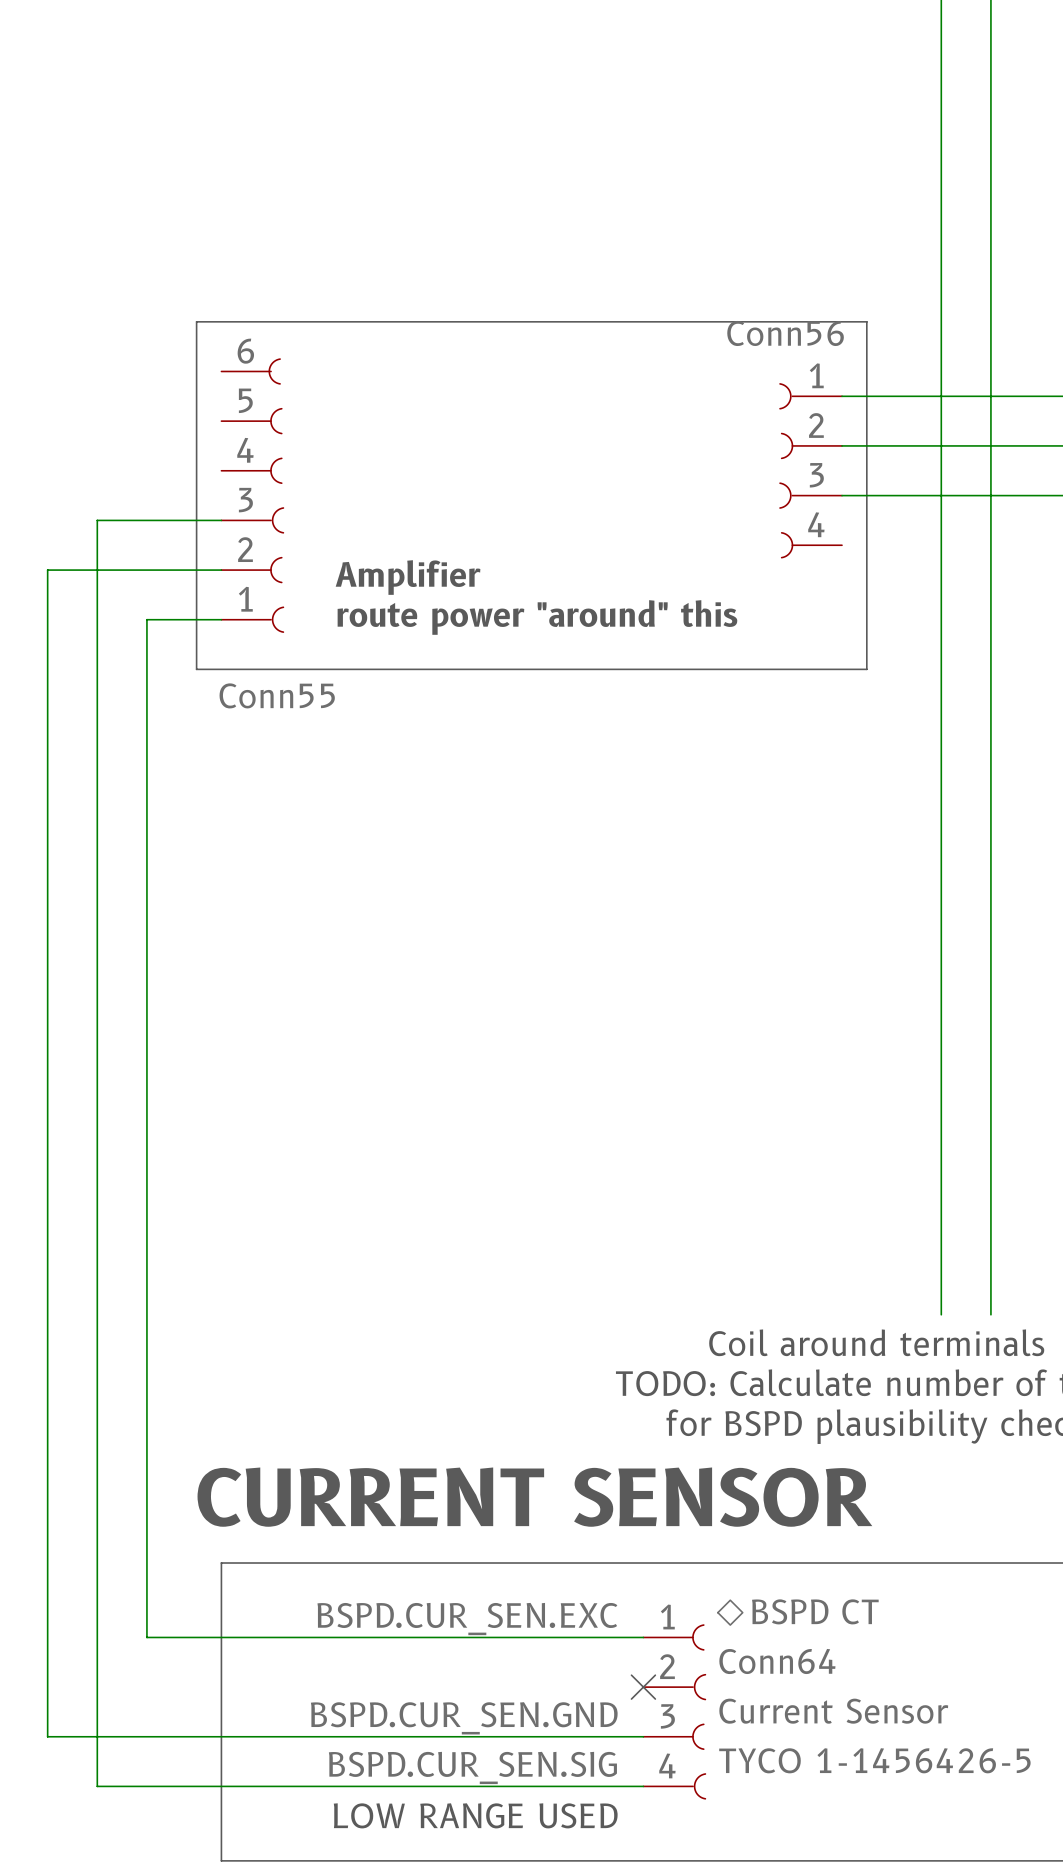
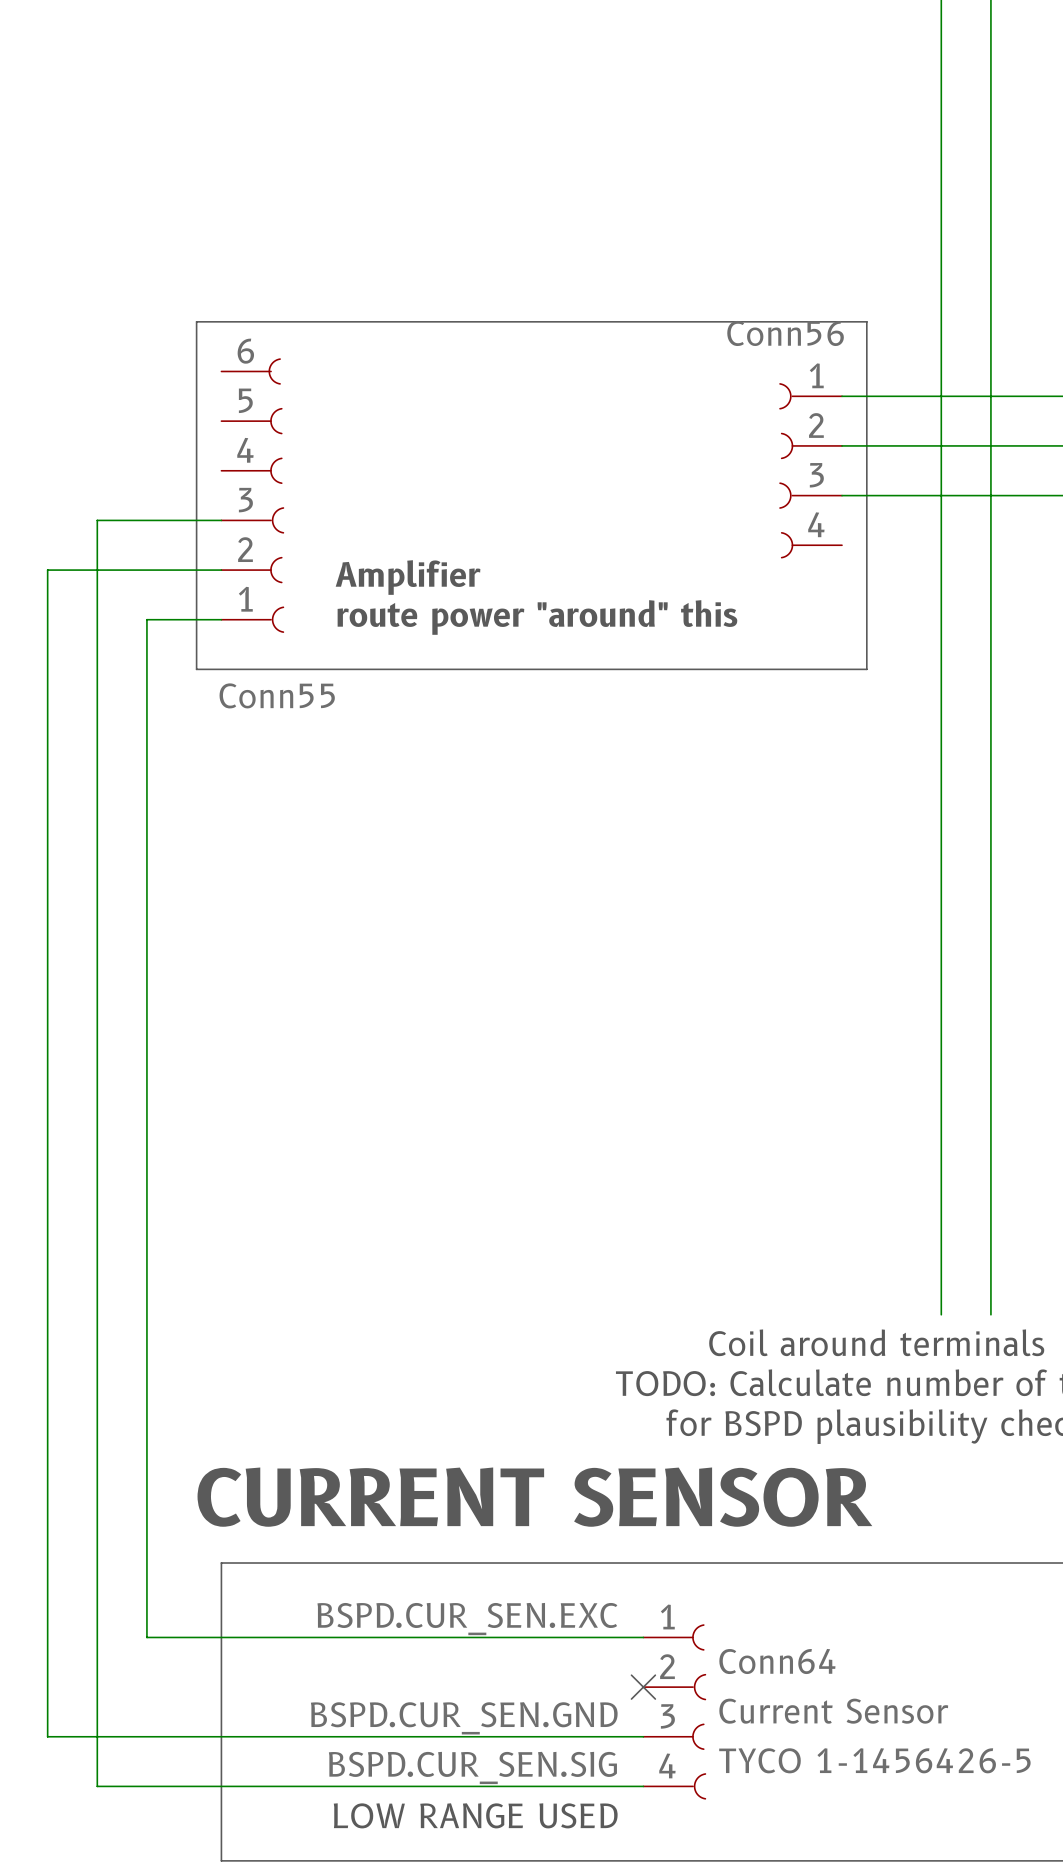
hierarchical label: BSPD CT (815, 1611) -> none

